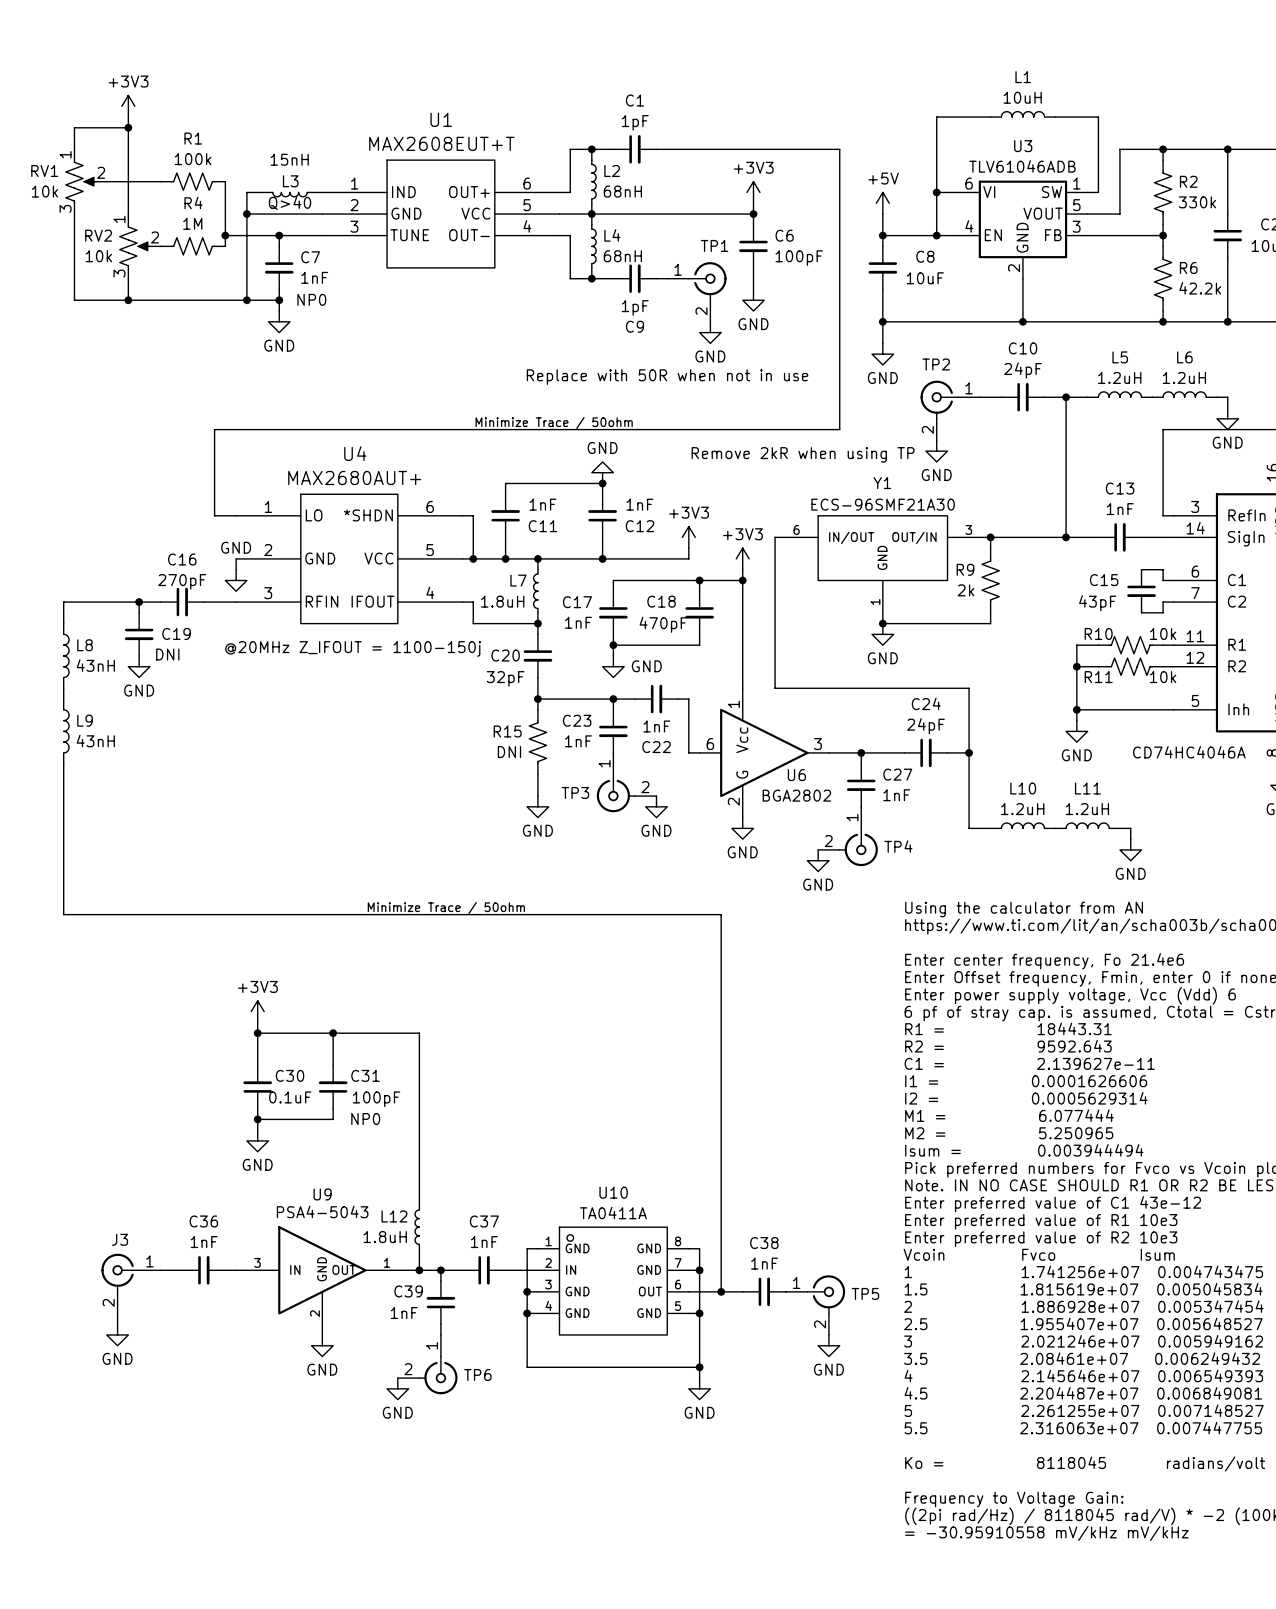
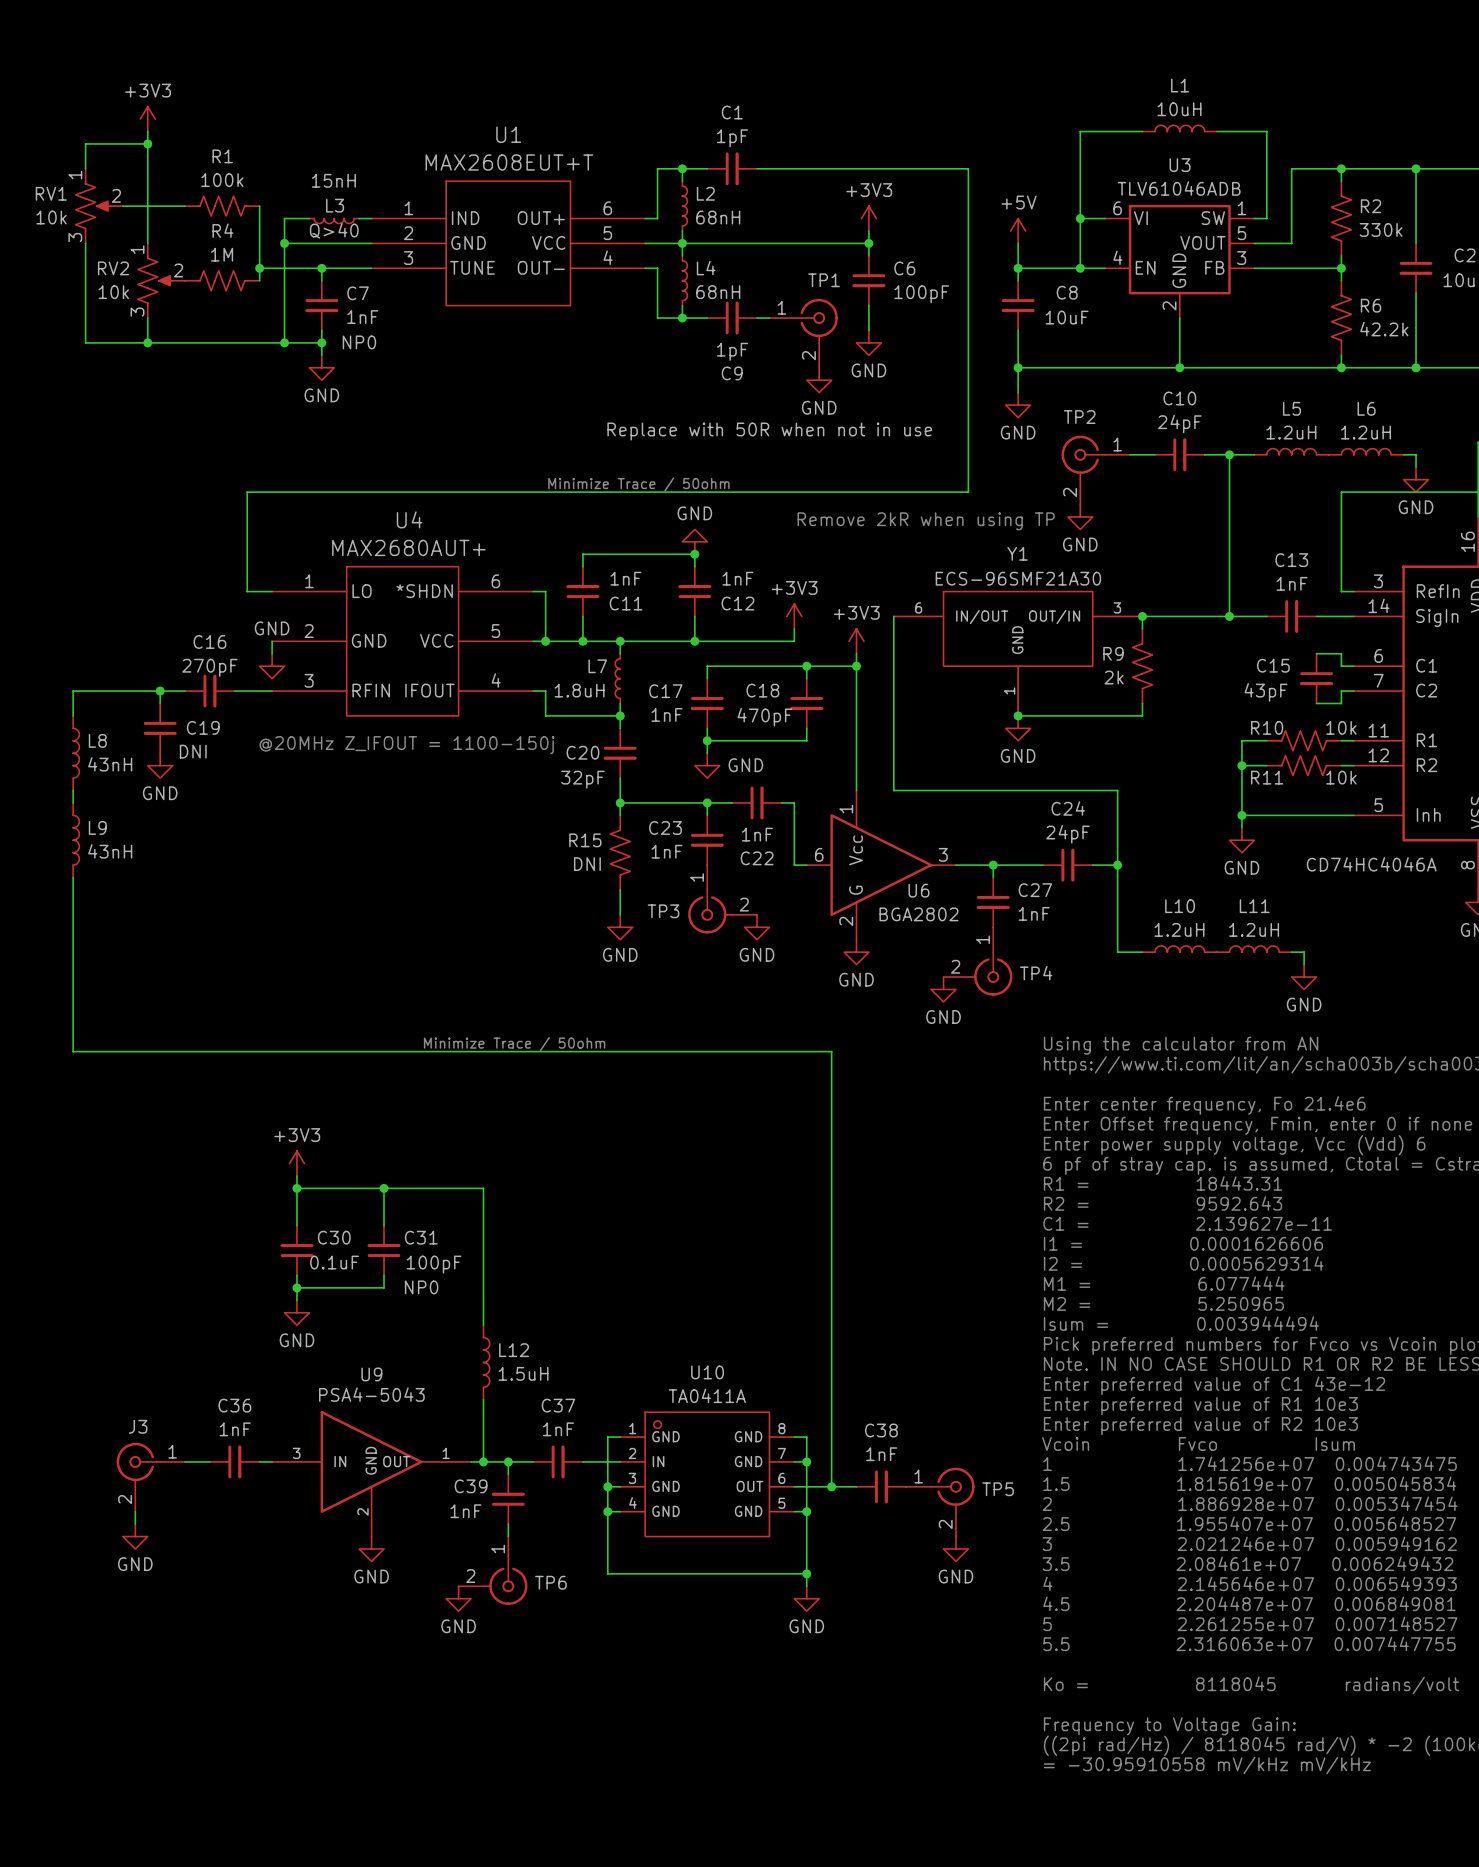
wire: (419, 1151) (419, 1205) -> none
L12 symbol: [415, 1205, 420, 1249] -> [483, 1325, 490, 1400]
L12 name position: L12 (394, 1216) -> L12 (514, 1350)
wire: none -> (483, 1399) (483, 1437)
L12 value: 1.8uH (385, 1237) -> 1.5uH (523, 1373)

